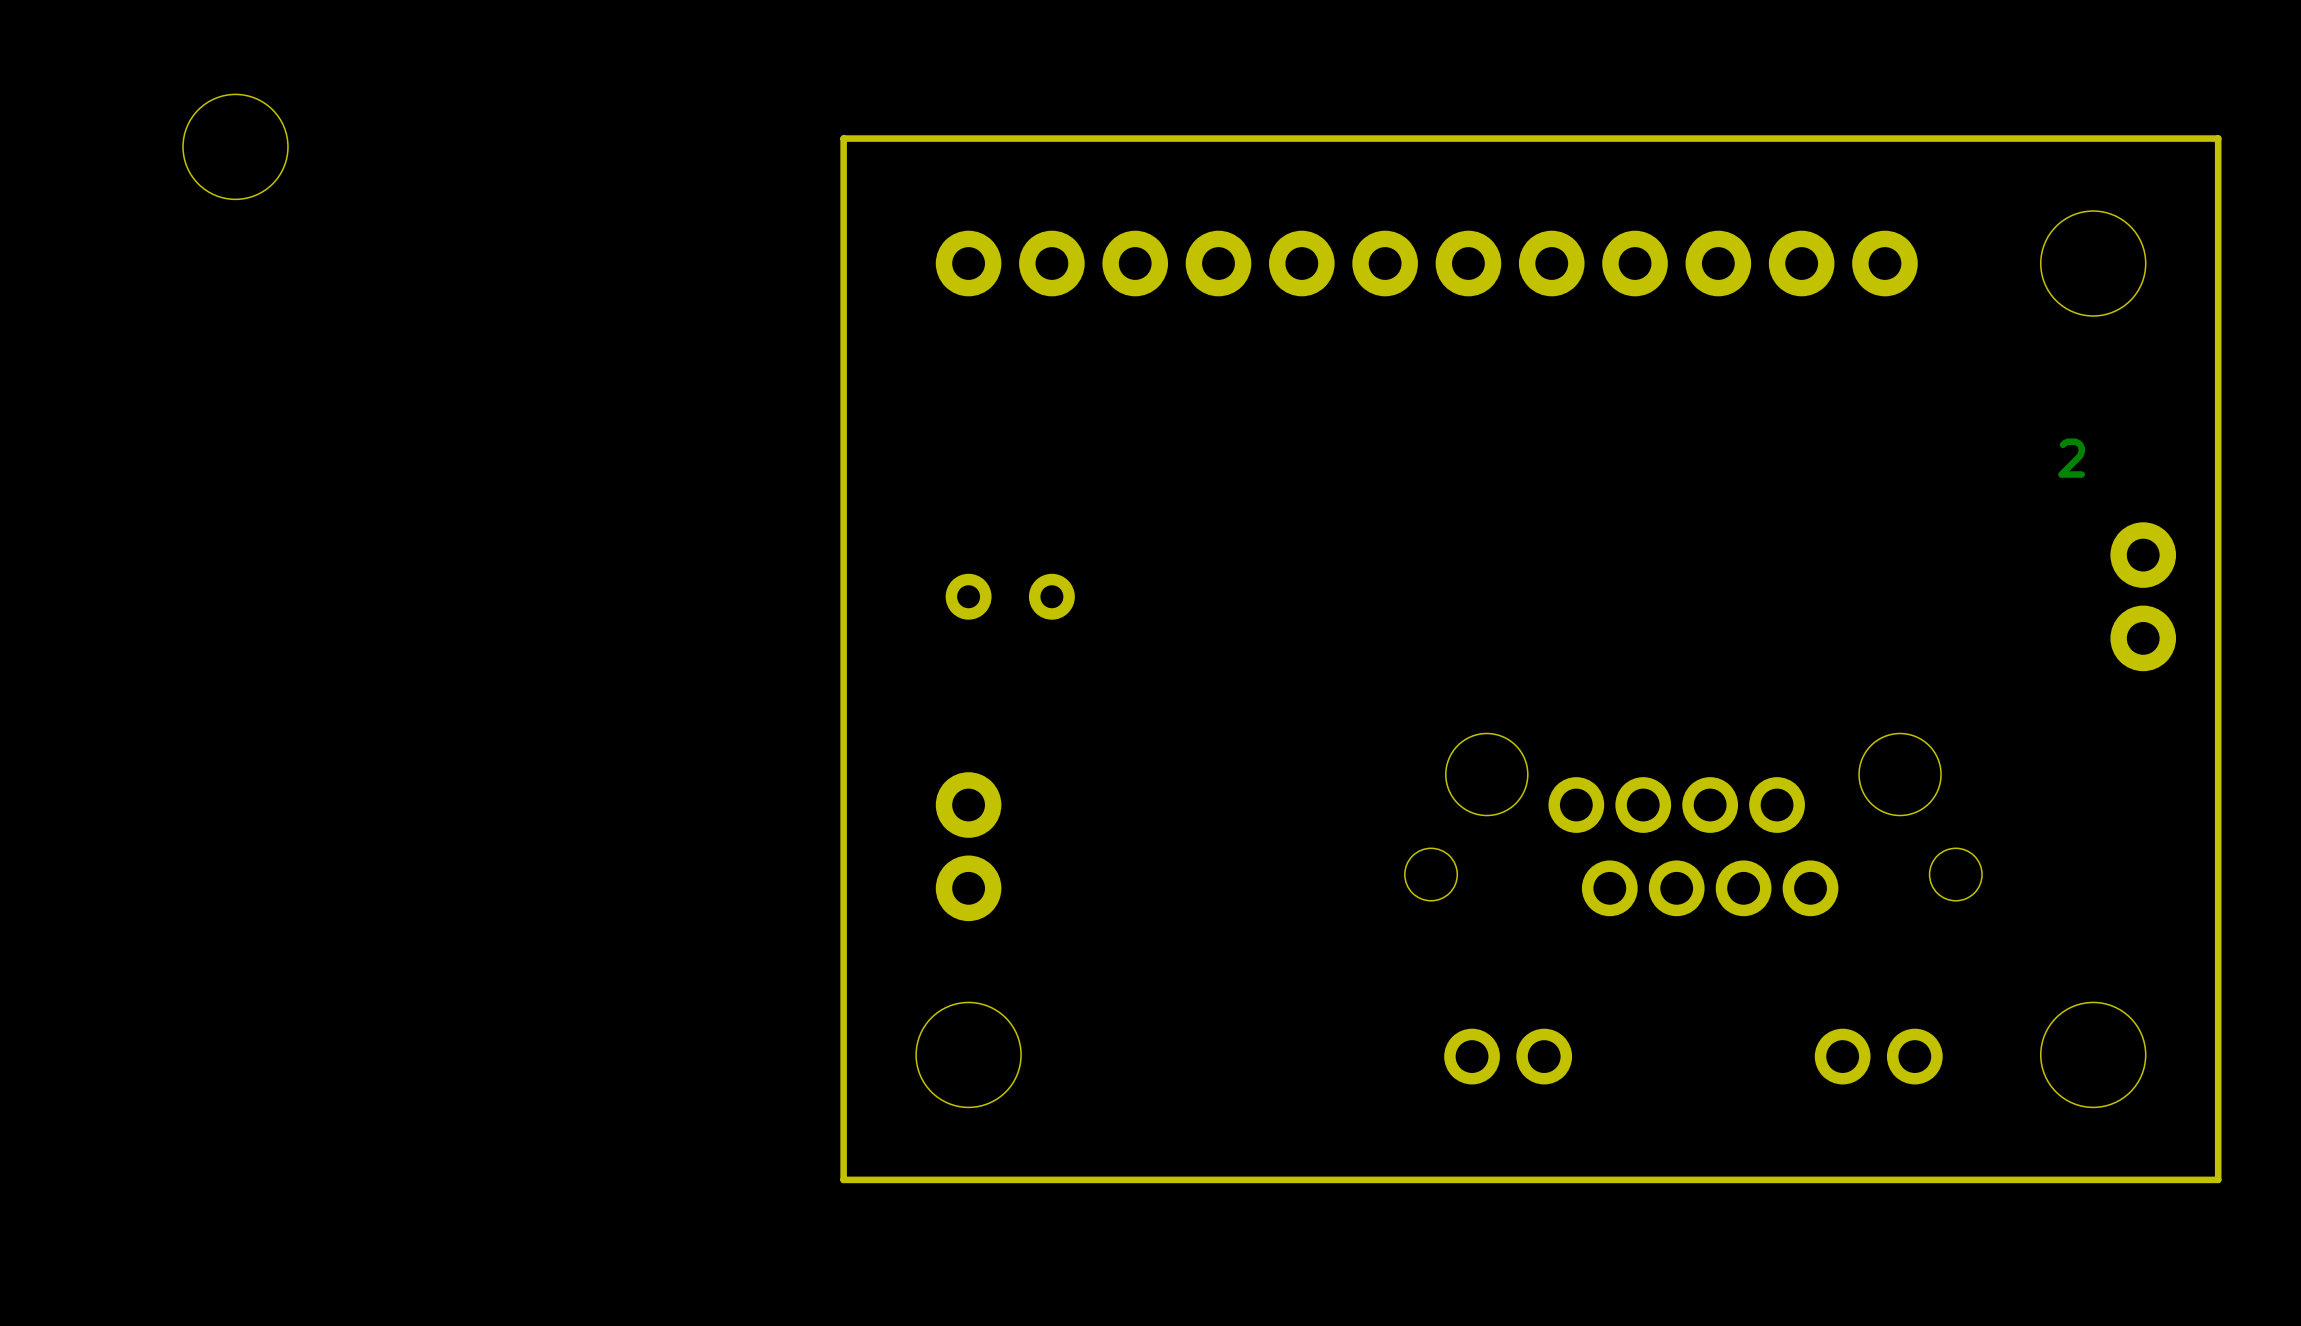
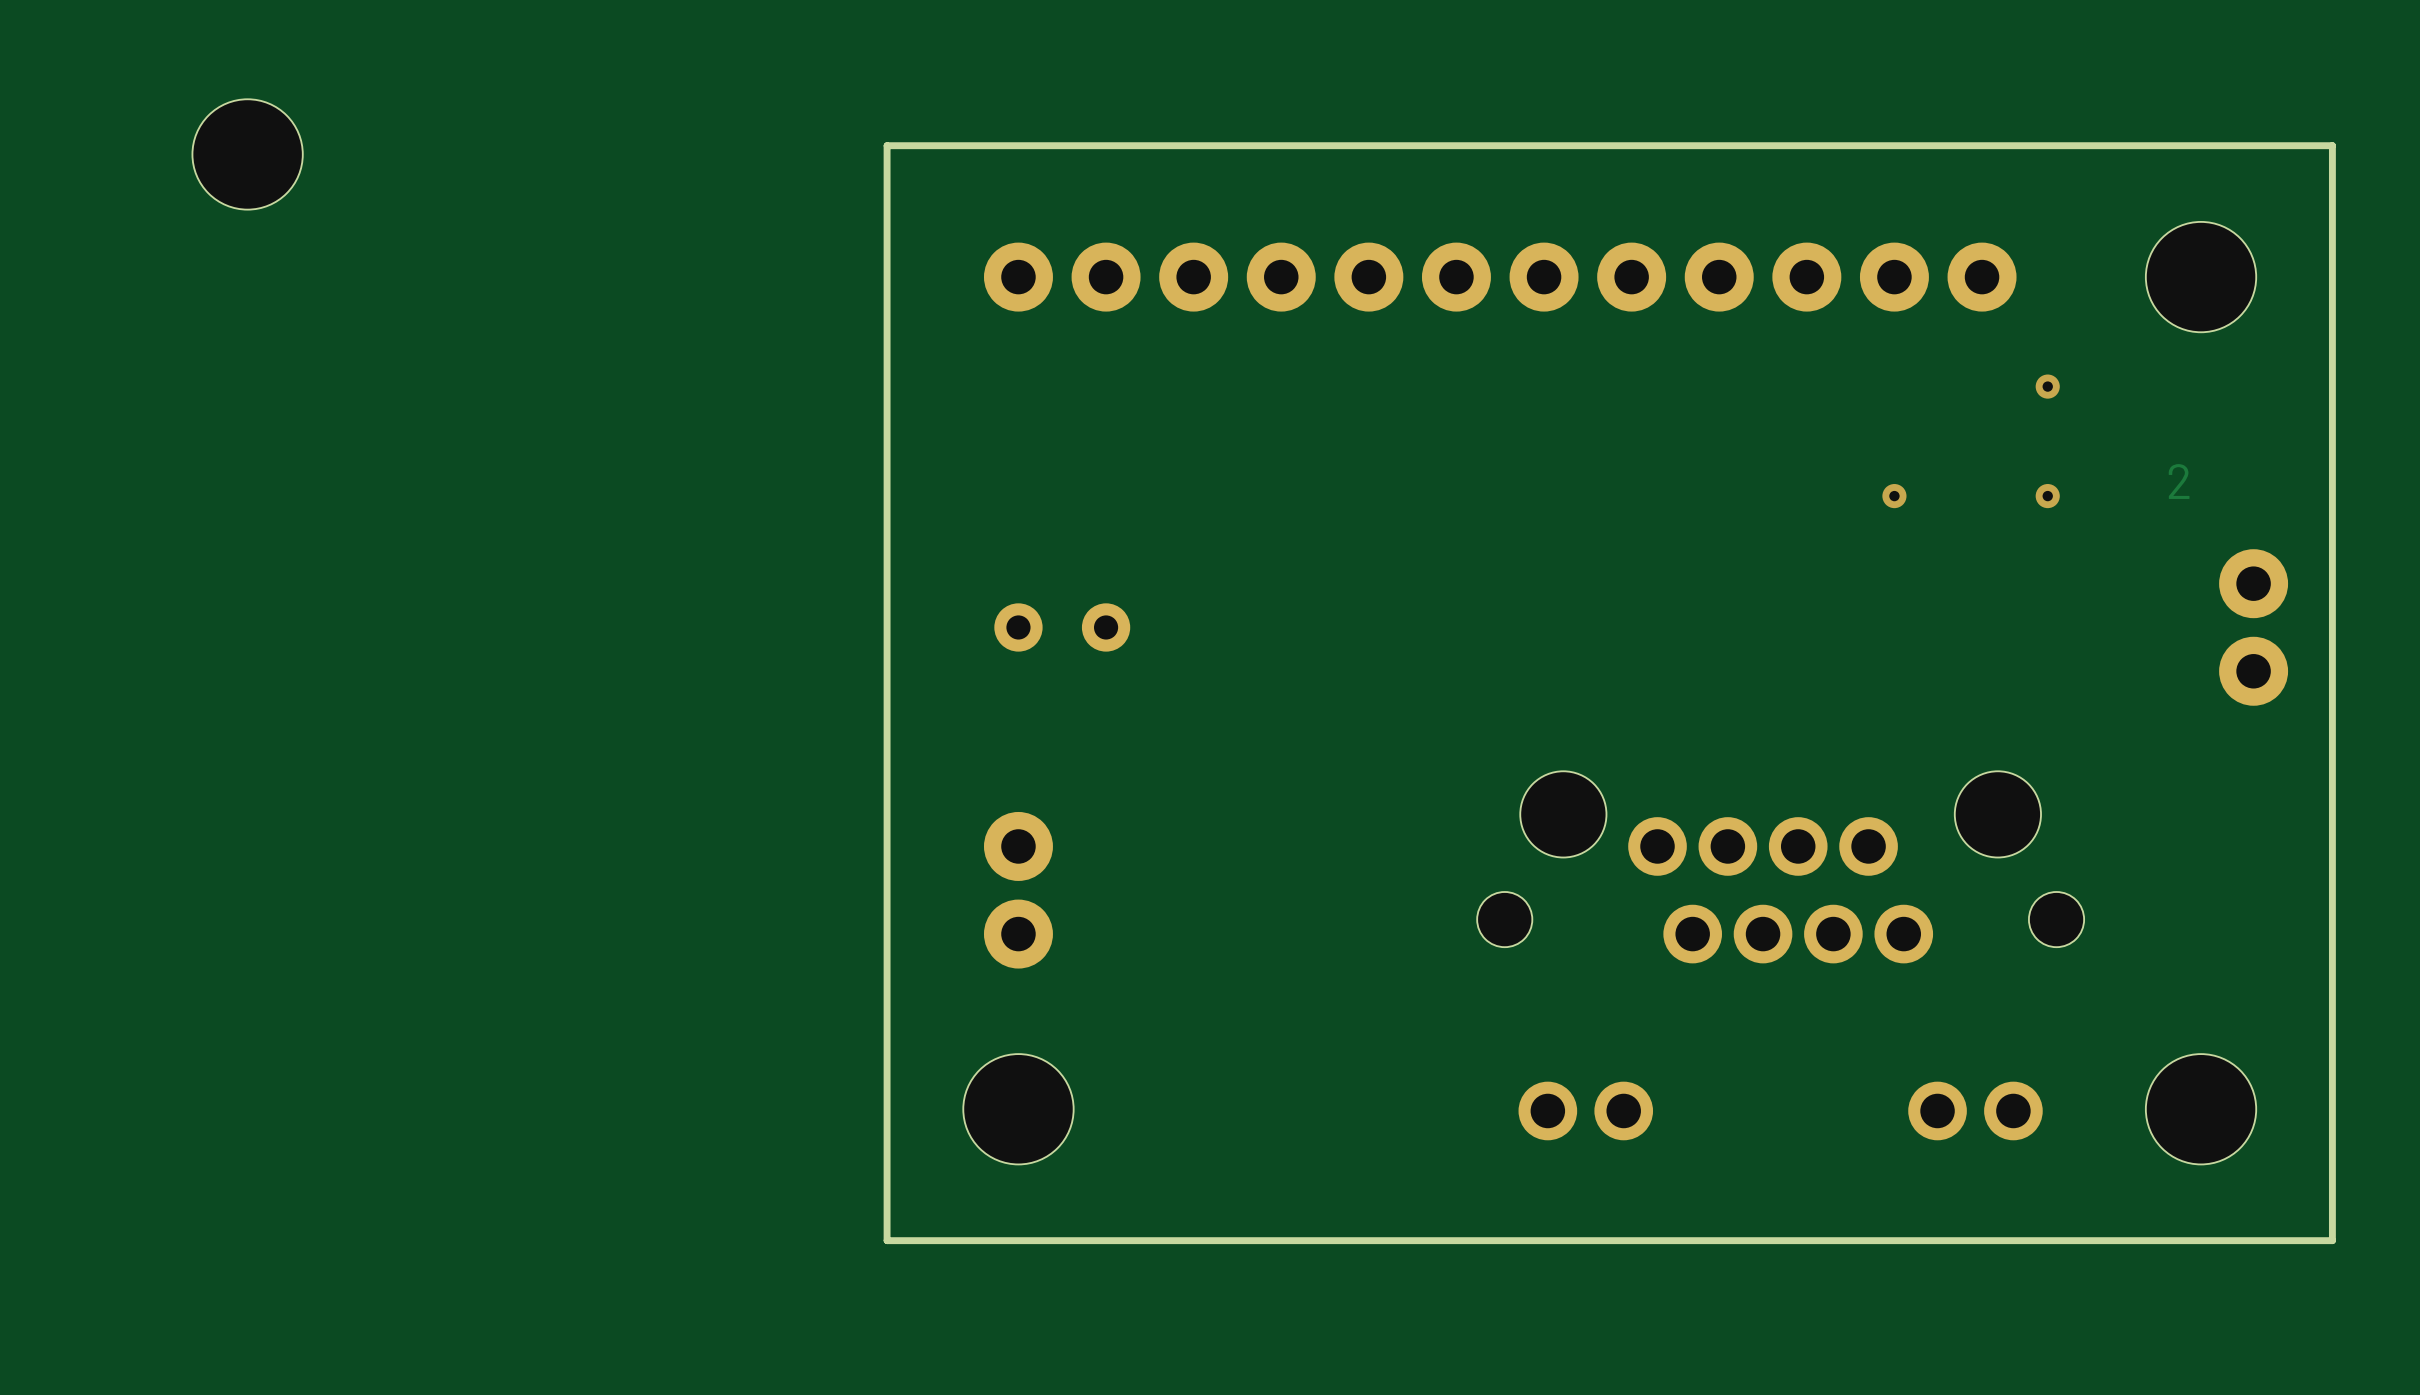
via: none -> (2047, 386)
via: none -> (1894, 496)
via: none -> (2047, 496)

